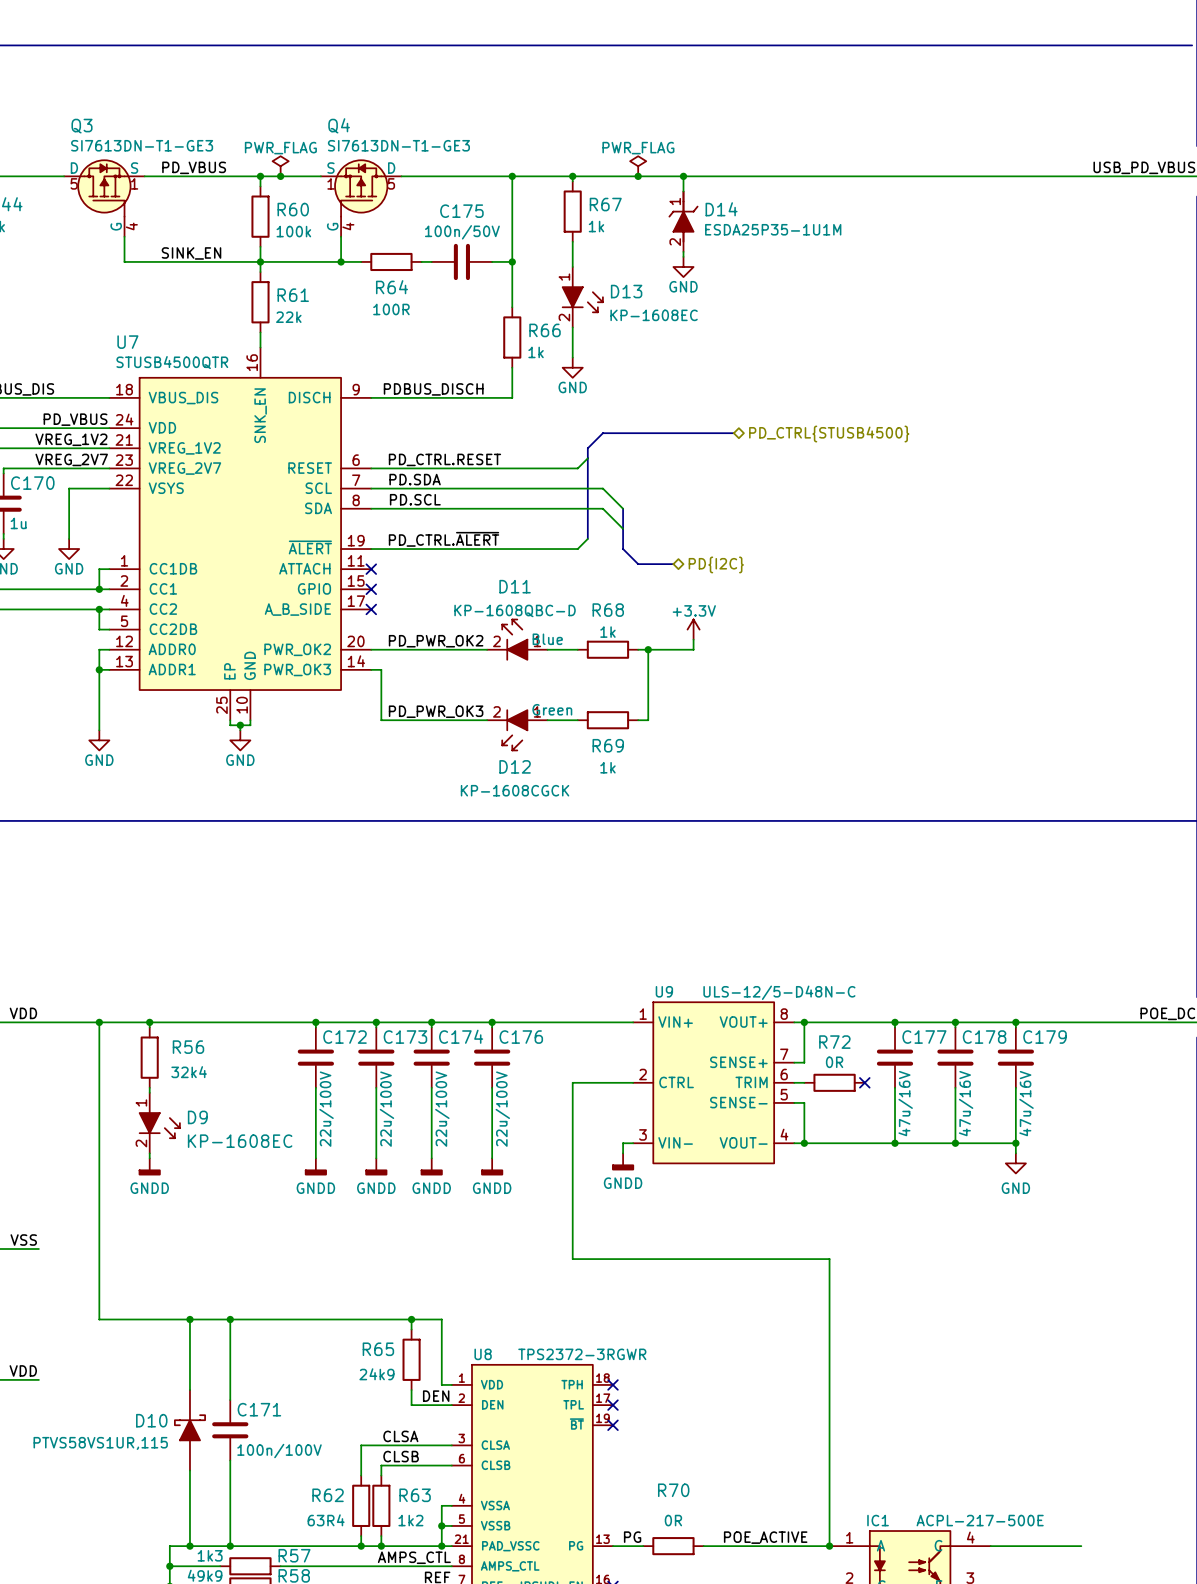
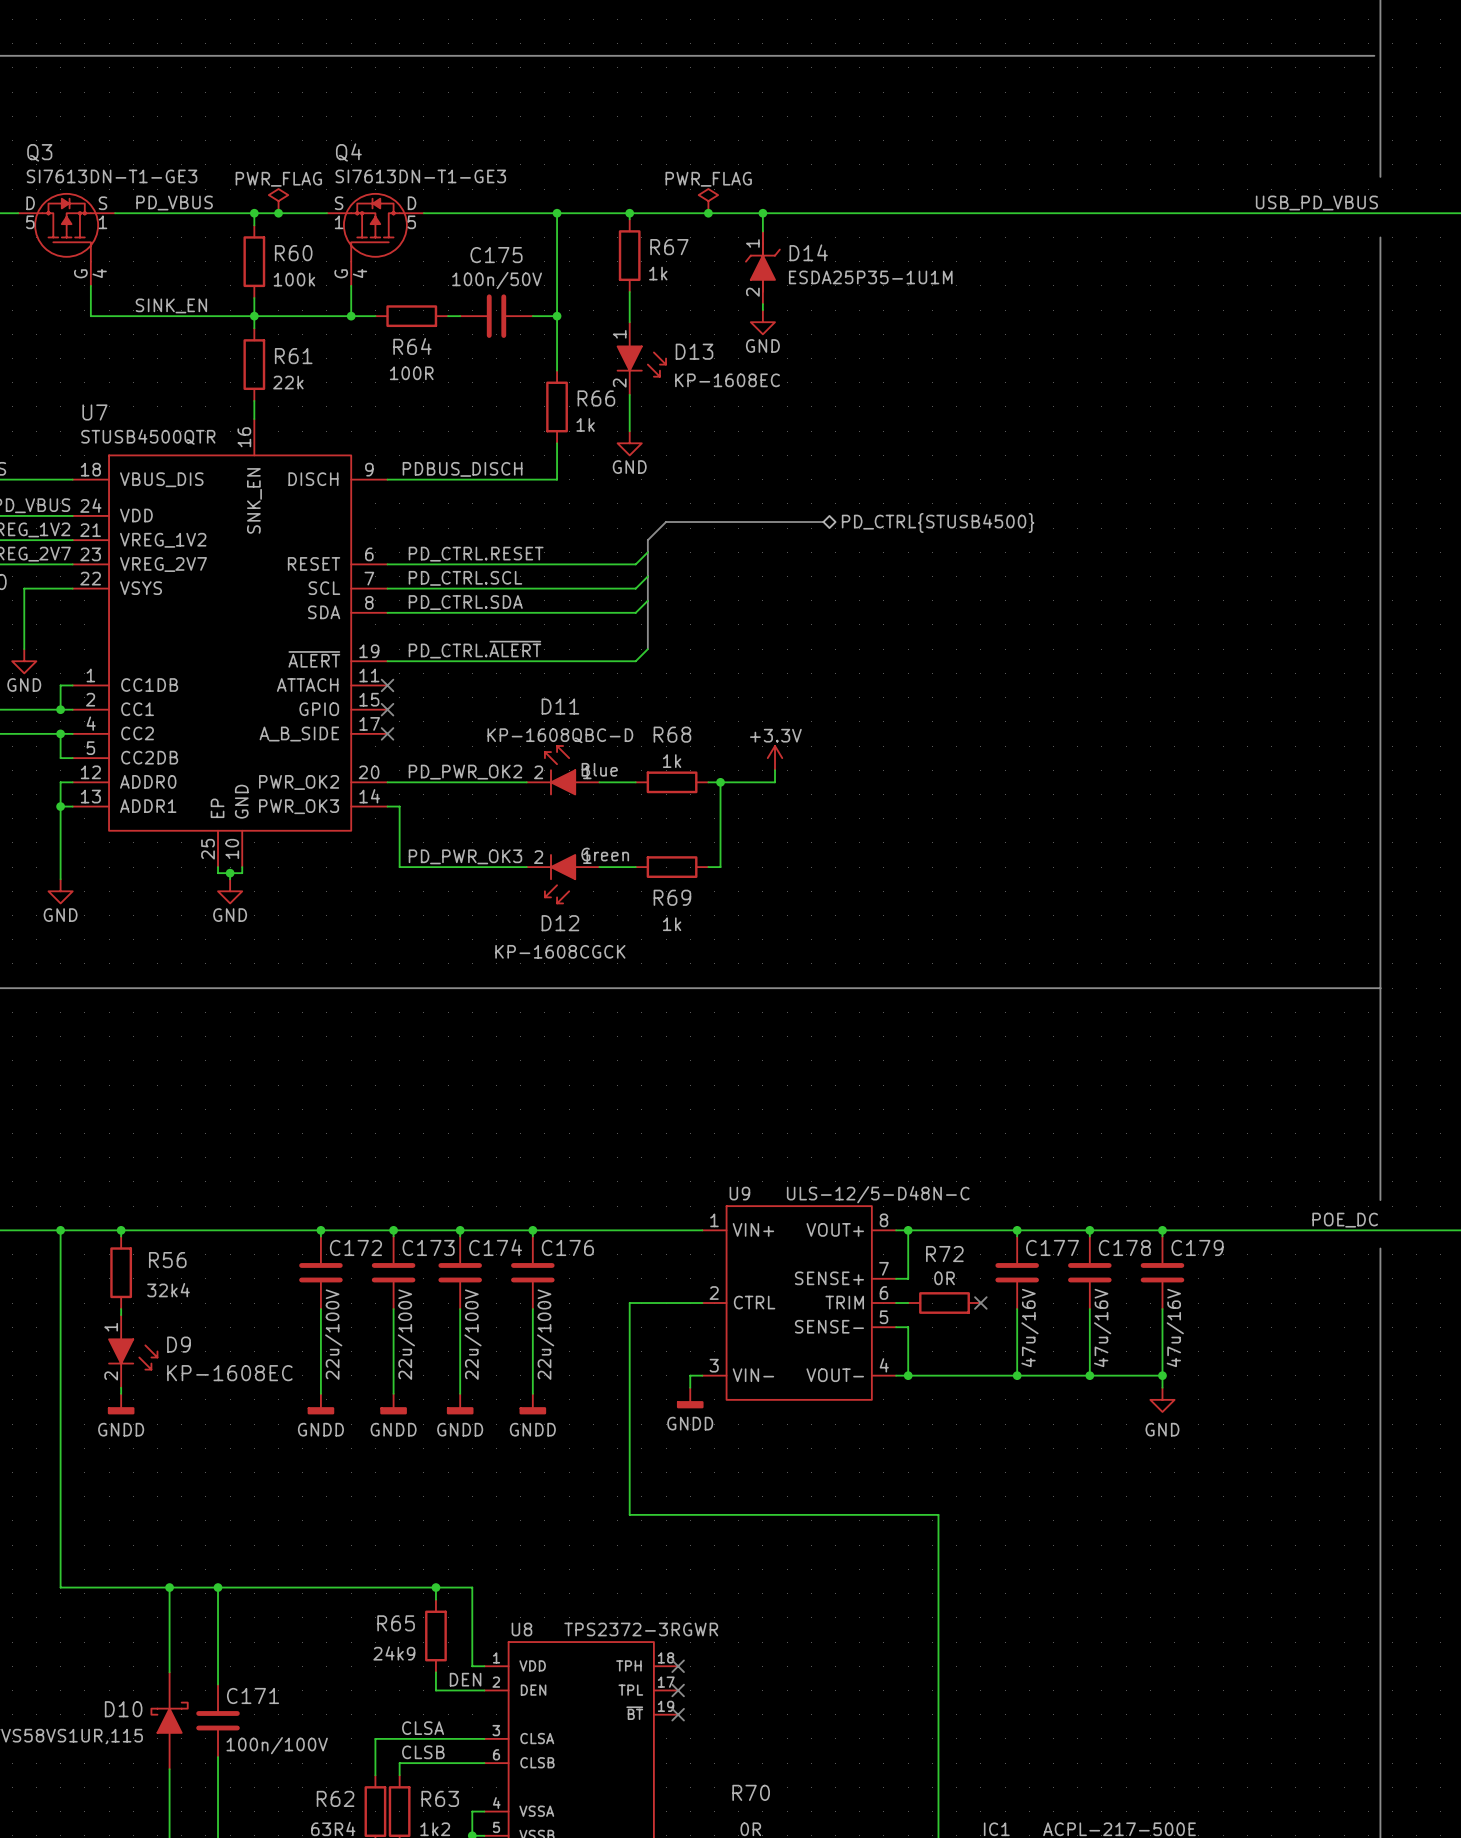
label: PD.SDA (415, 479) -> PD_CTRL.SDA (465, 602)
wire: (577, 488) (602, 488) (623, 508) -> (635, 588) (647, 576)
label: PD.SCL (415, 499) -> PD_CTRL.SCL (465, 578)
wire: (577, 508) (602, 508) (623, 528) -> (635, 612) (647, 600)
bus: (623, 508) (623, 549) (638, 564) (673, 564) -> none
hierarchical label: PD{I2C} (716, 564) -> none

